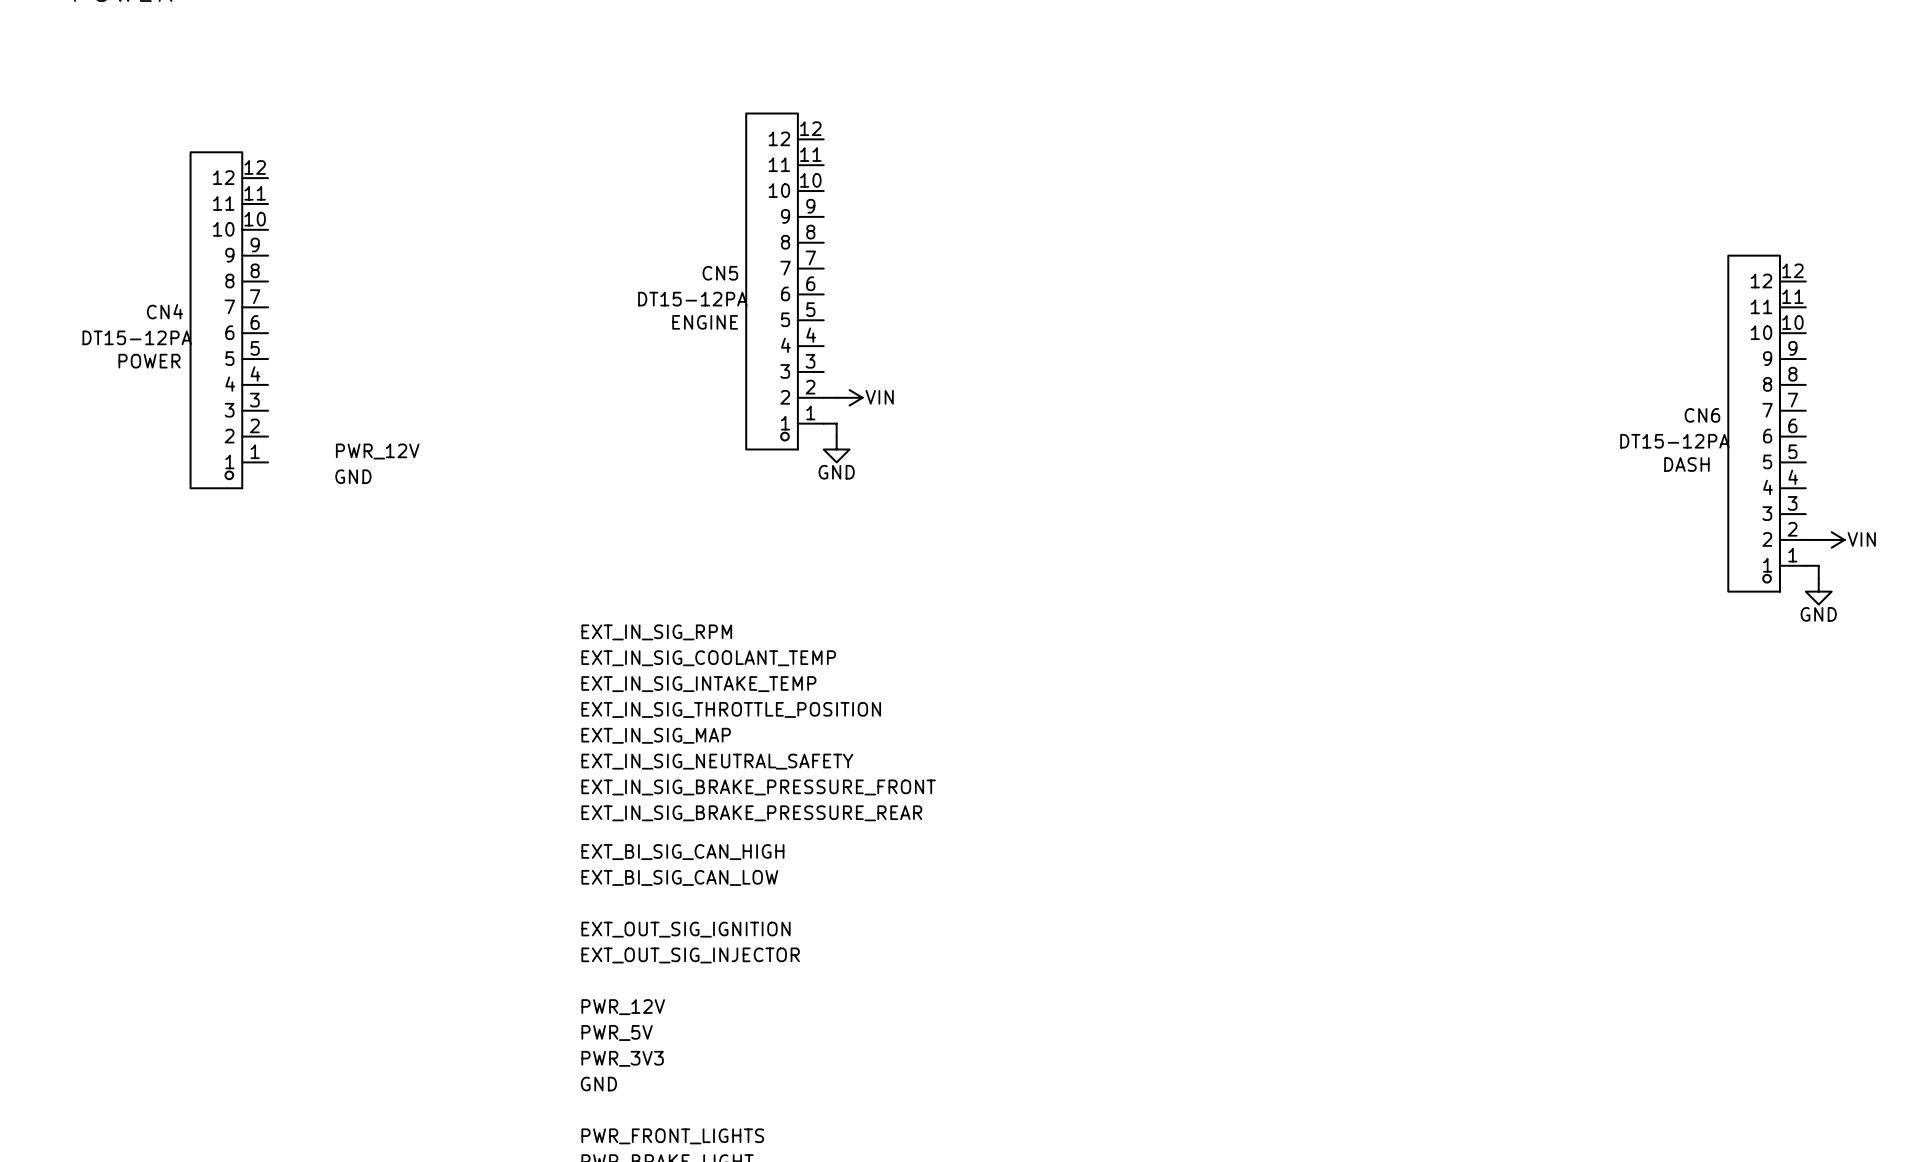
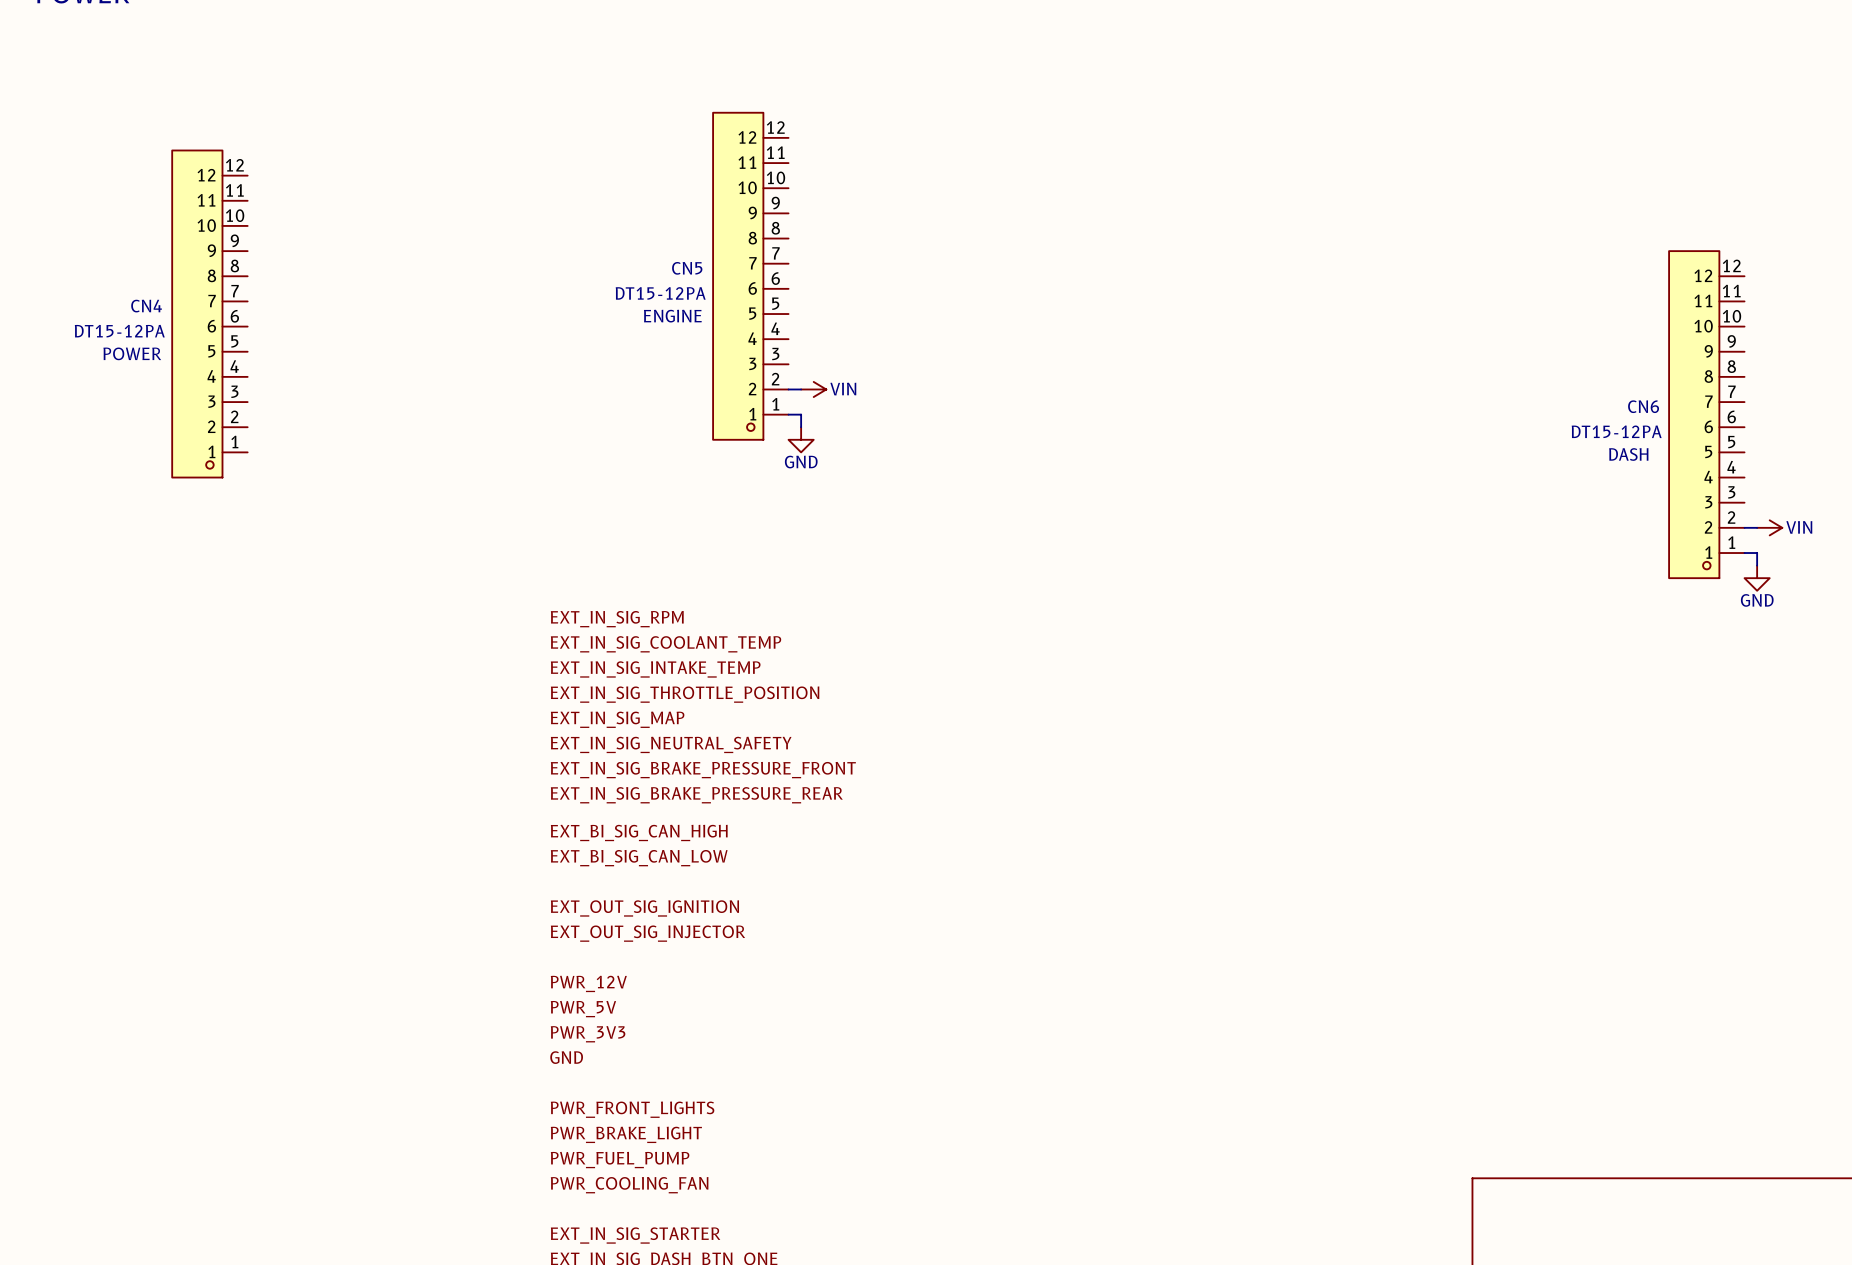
label: PWR_12V (377, 451) -> none
label: GND (353, 476) -> none

